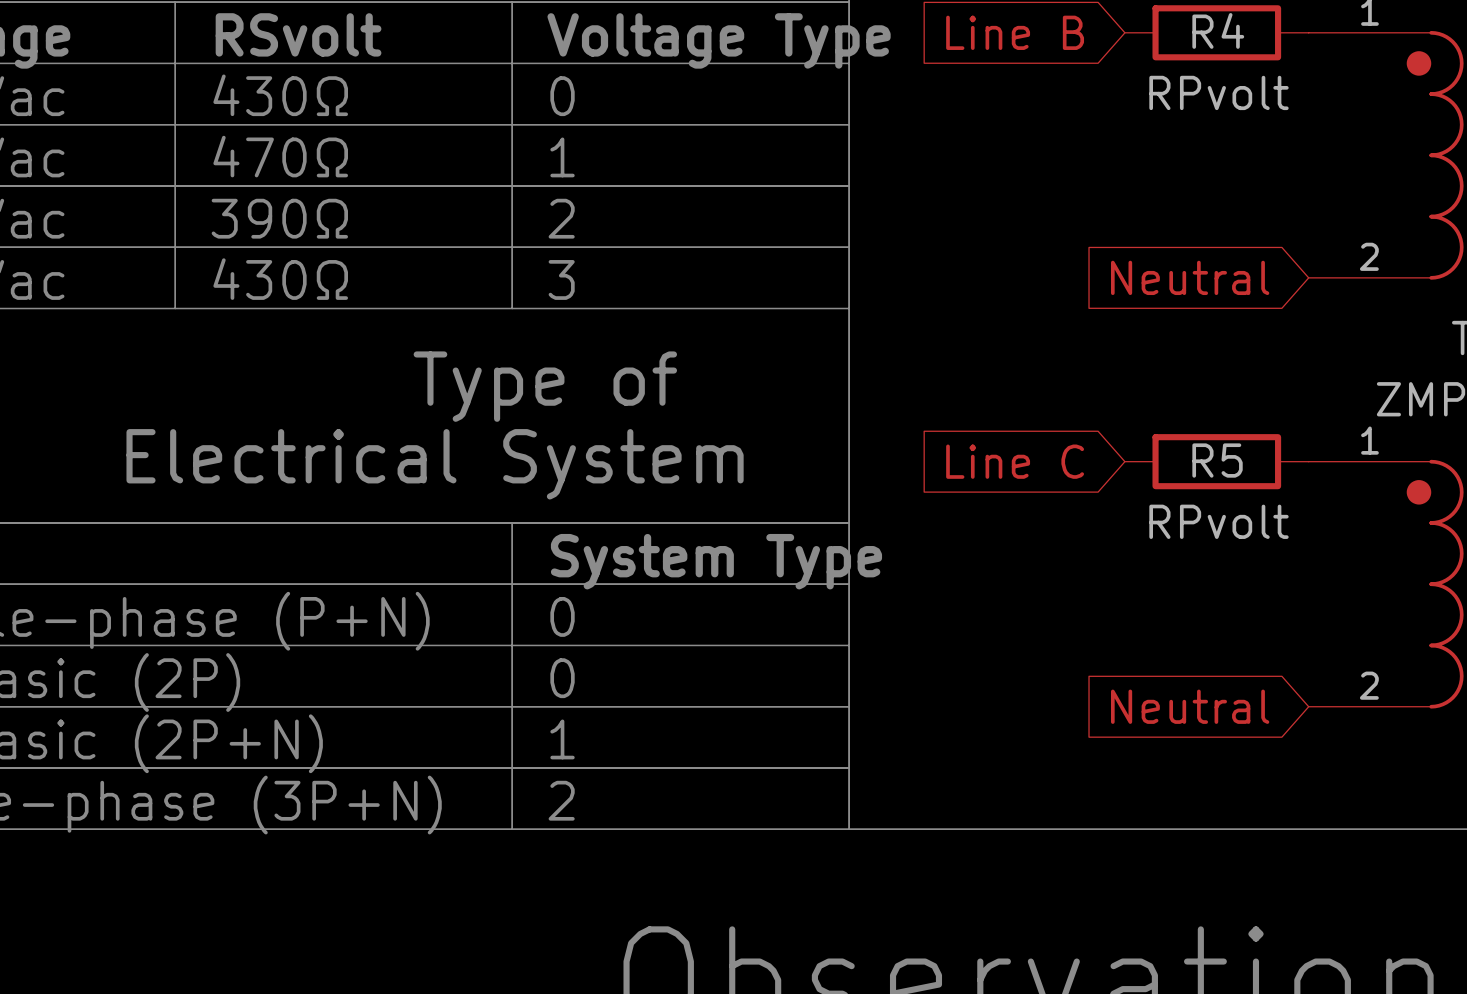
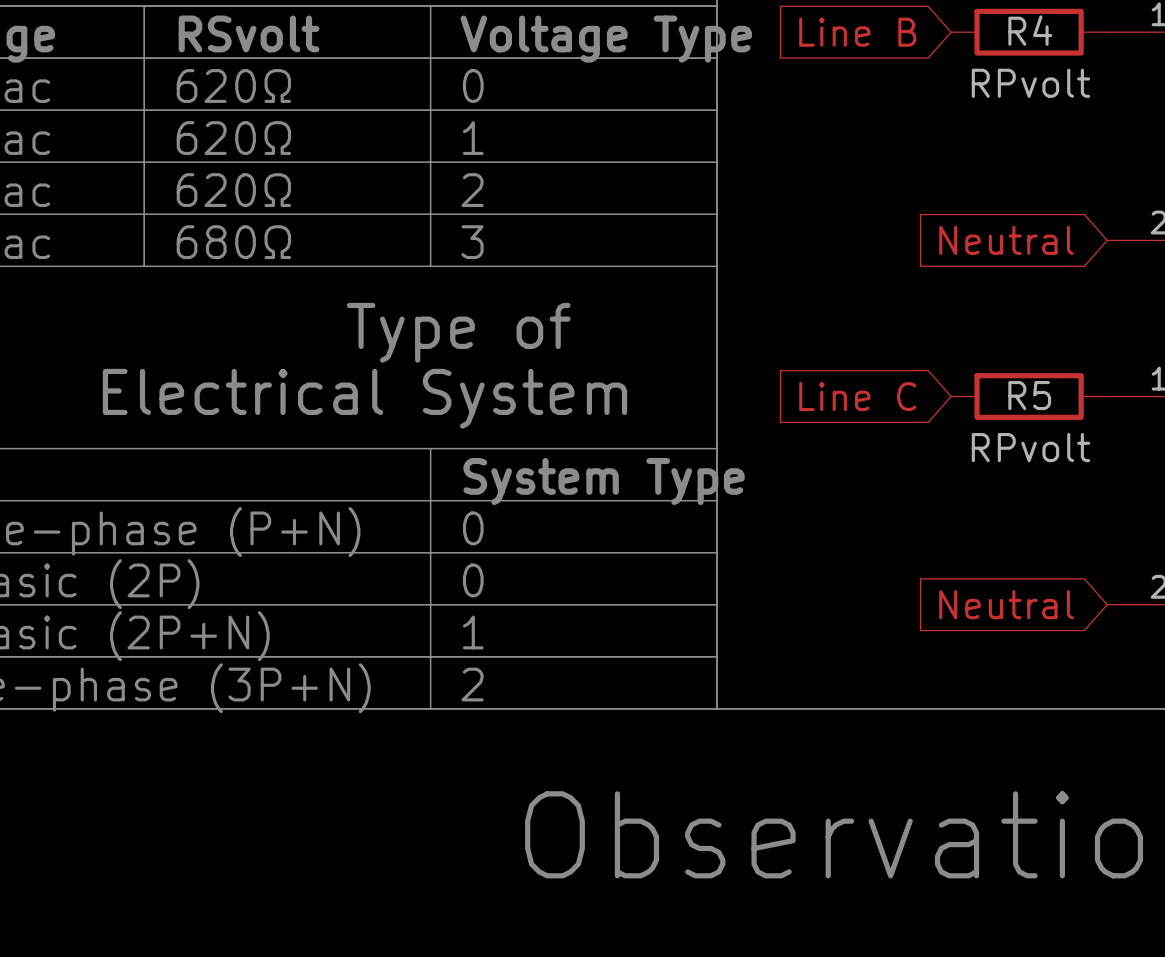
text: 430Ω (280, 95) -> 620Ω (233, 86)
text: 470Ω (280, 156) -> 620Ω (233, 138)
text: 390Ω (279, 218) -> 620Ω (233, 190)
text: 430Ω (280, 279) -> 680Ω (233, 242)

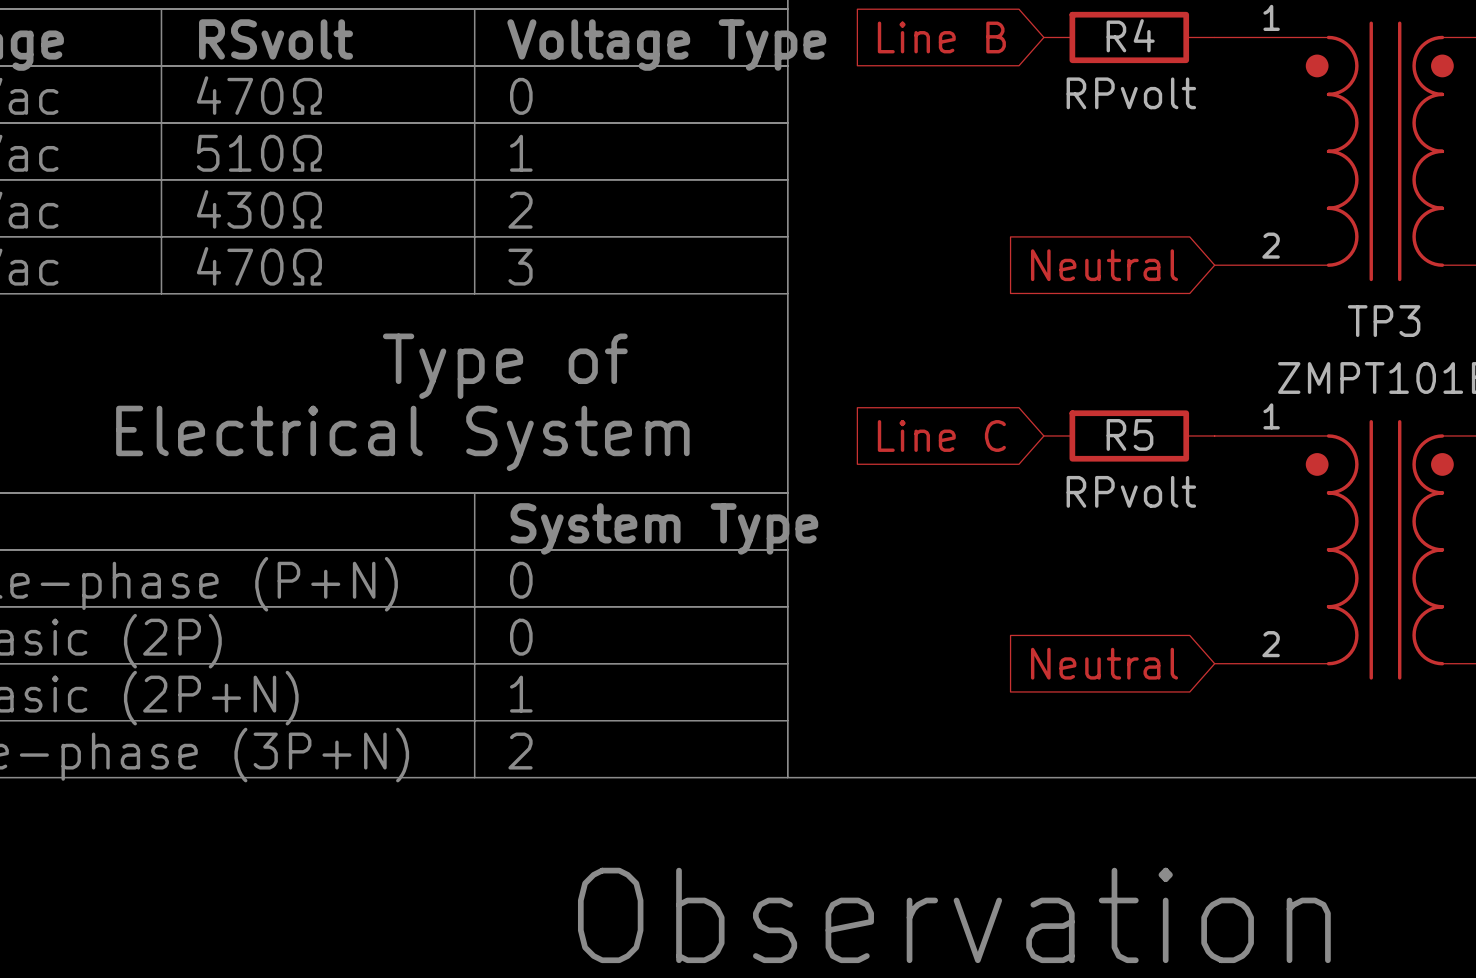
text: 620Ω (233, 86) -> 470Ω (259, 95)
text: 620Ω (233, 138) -> 510Ω (259, 153)
text: 620Ω (233, 190) -> 430Ω (259, 209)
text: 680Ω (233, 242) -> 470Ω (259, 266)

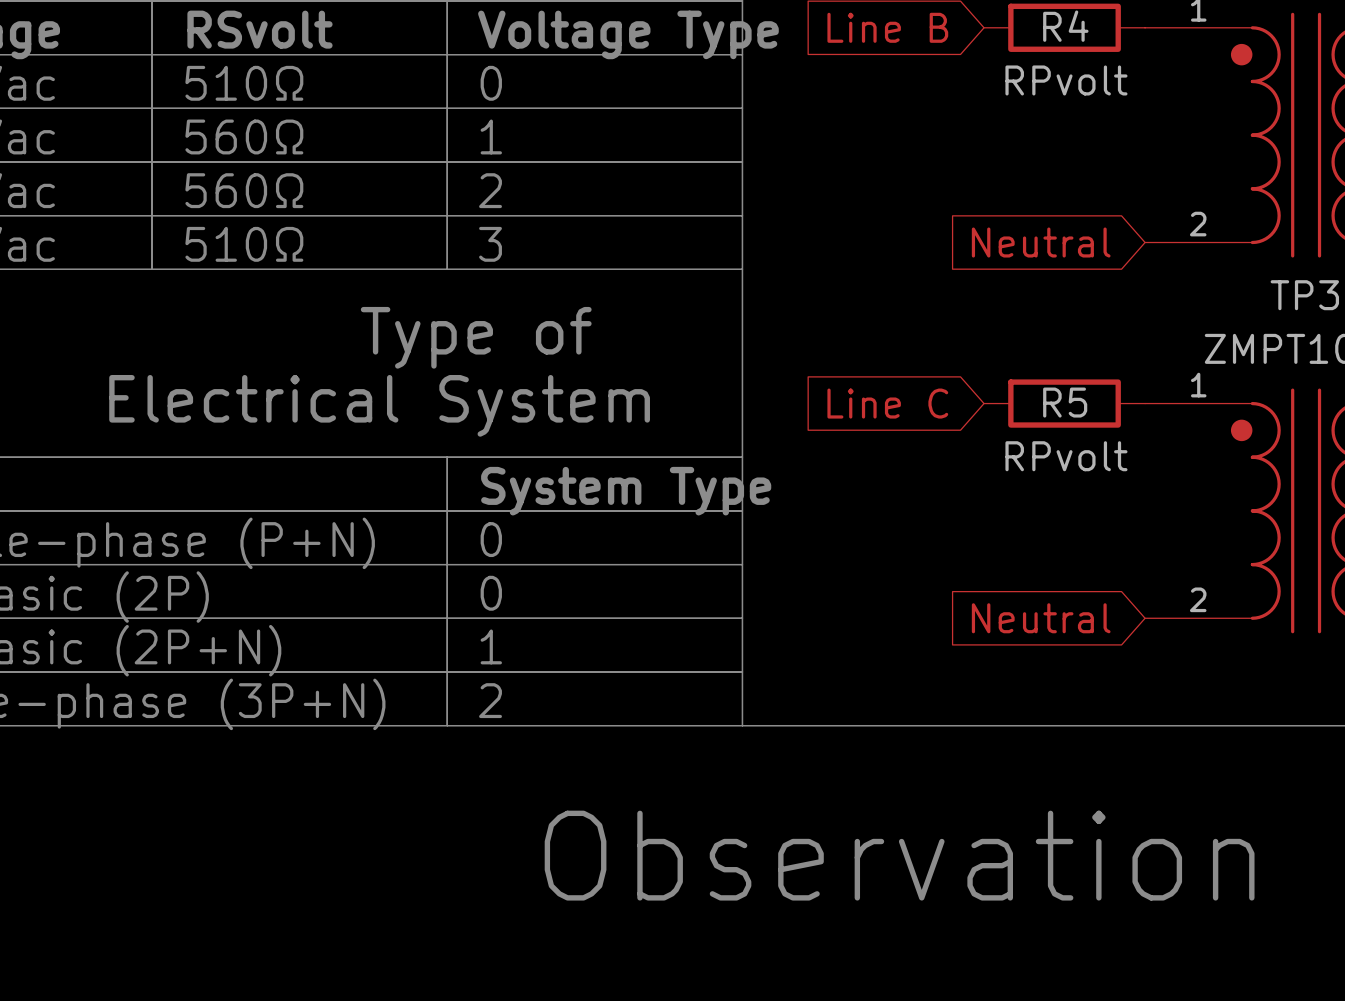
text: 470Ω (259, 95) -> 510Ω (244, 83)
text: 510Ω (259, 153) -> 560Ω (244, 136)
text: 430Ω (259, 209) -> 560Ω (244, 190)
text: 470Ω (259, 266) -> 510Ω (244, 244)

